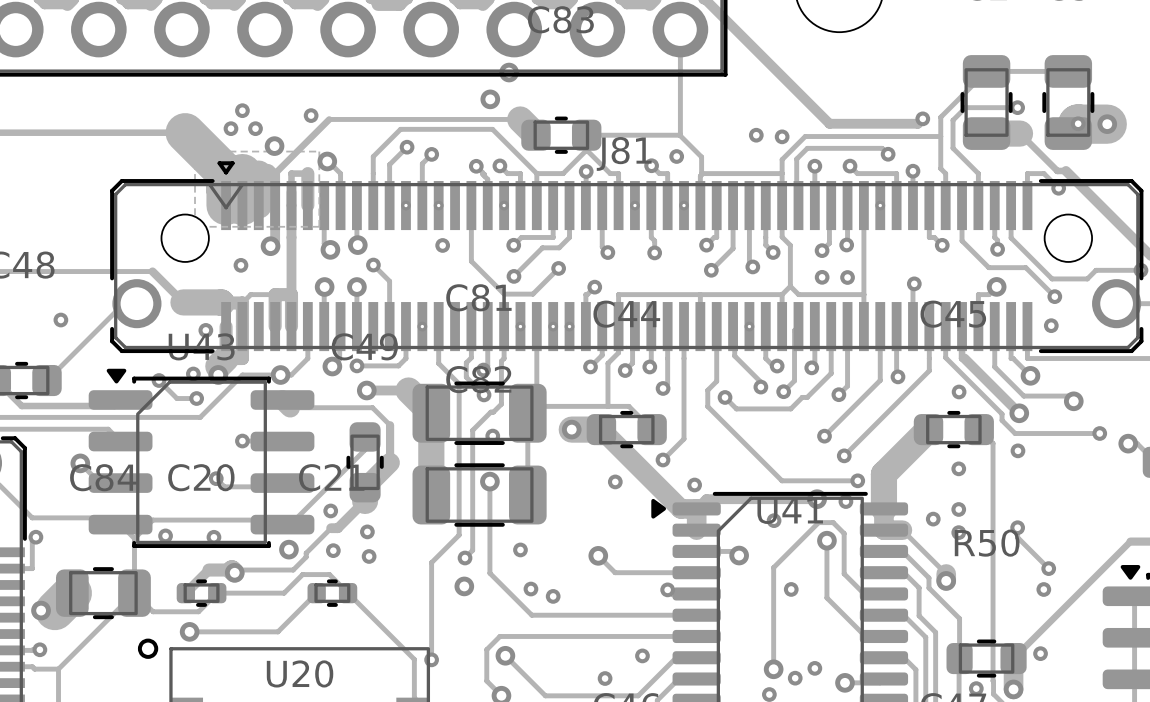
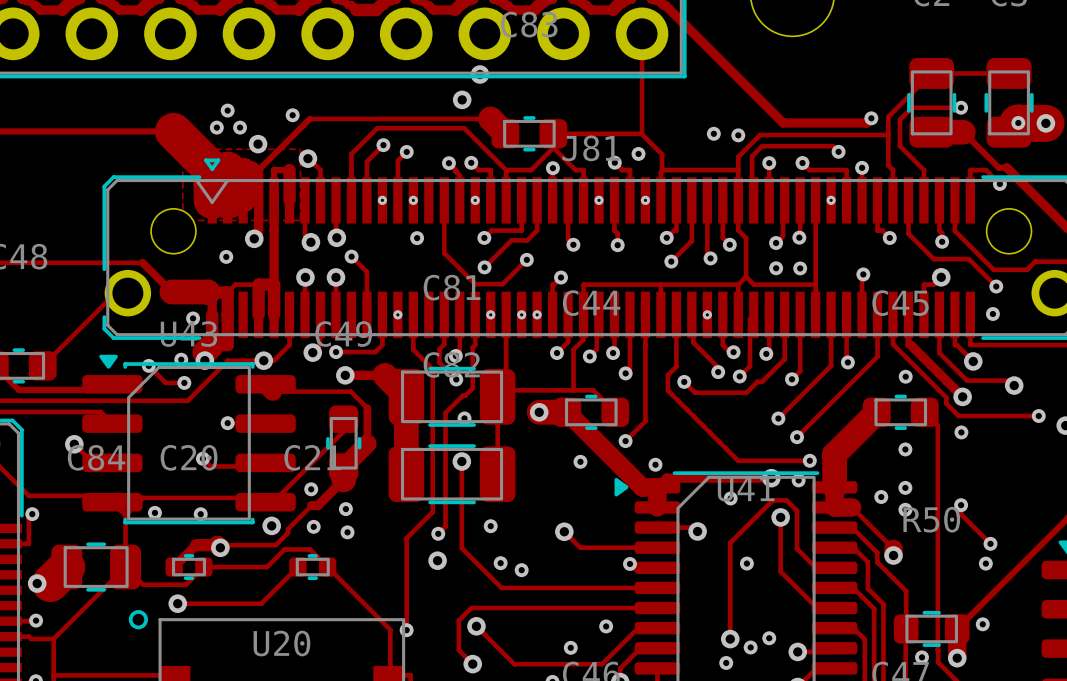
via: (60, 320) -> none

